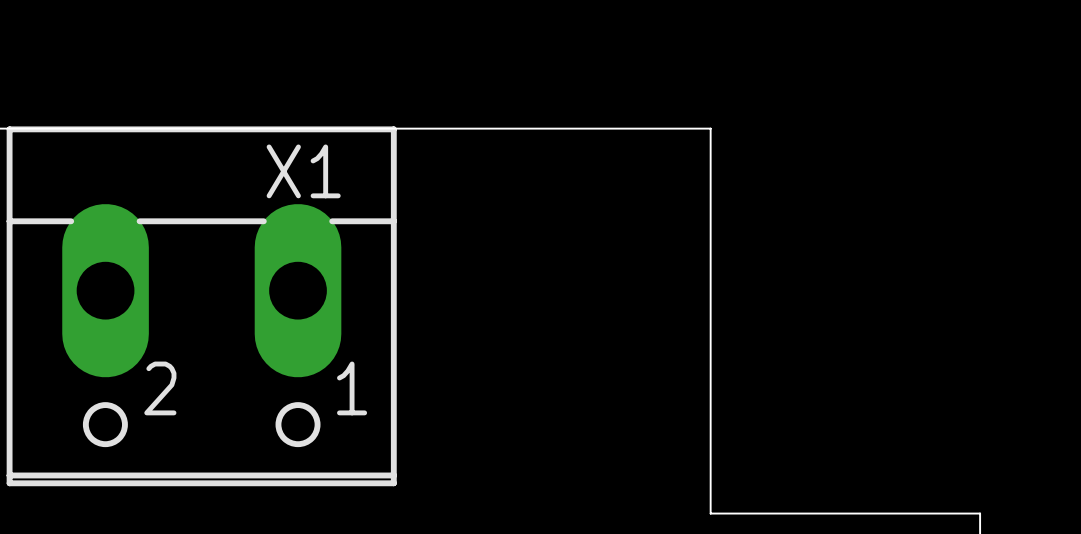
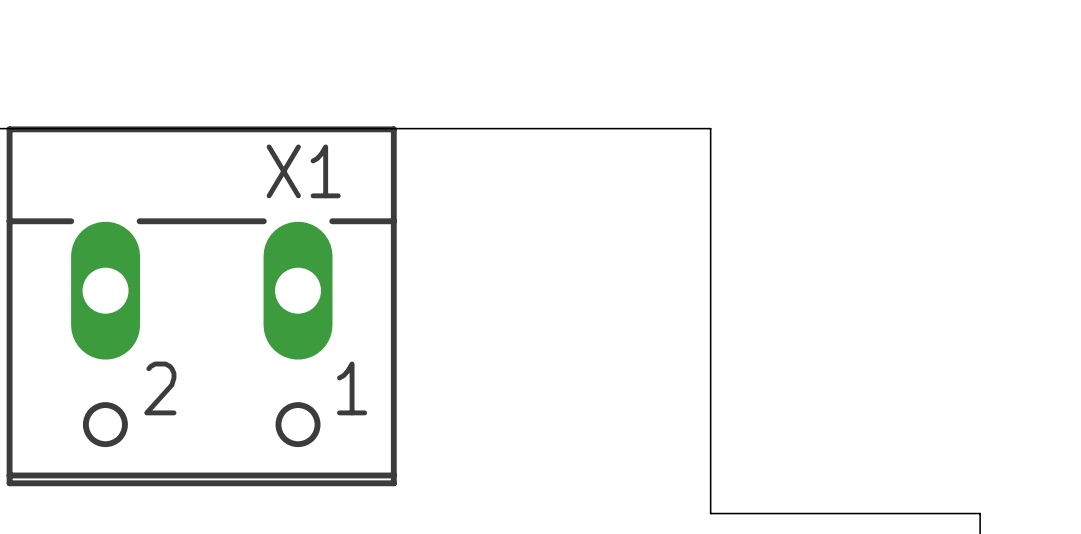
X1 footprint: [6, 126, 397, 487] -> [6, 126, 397, 487]

